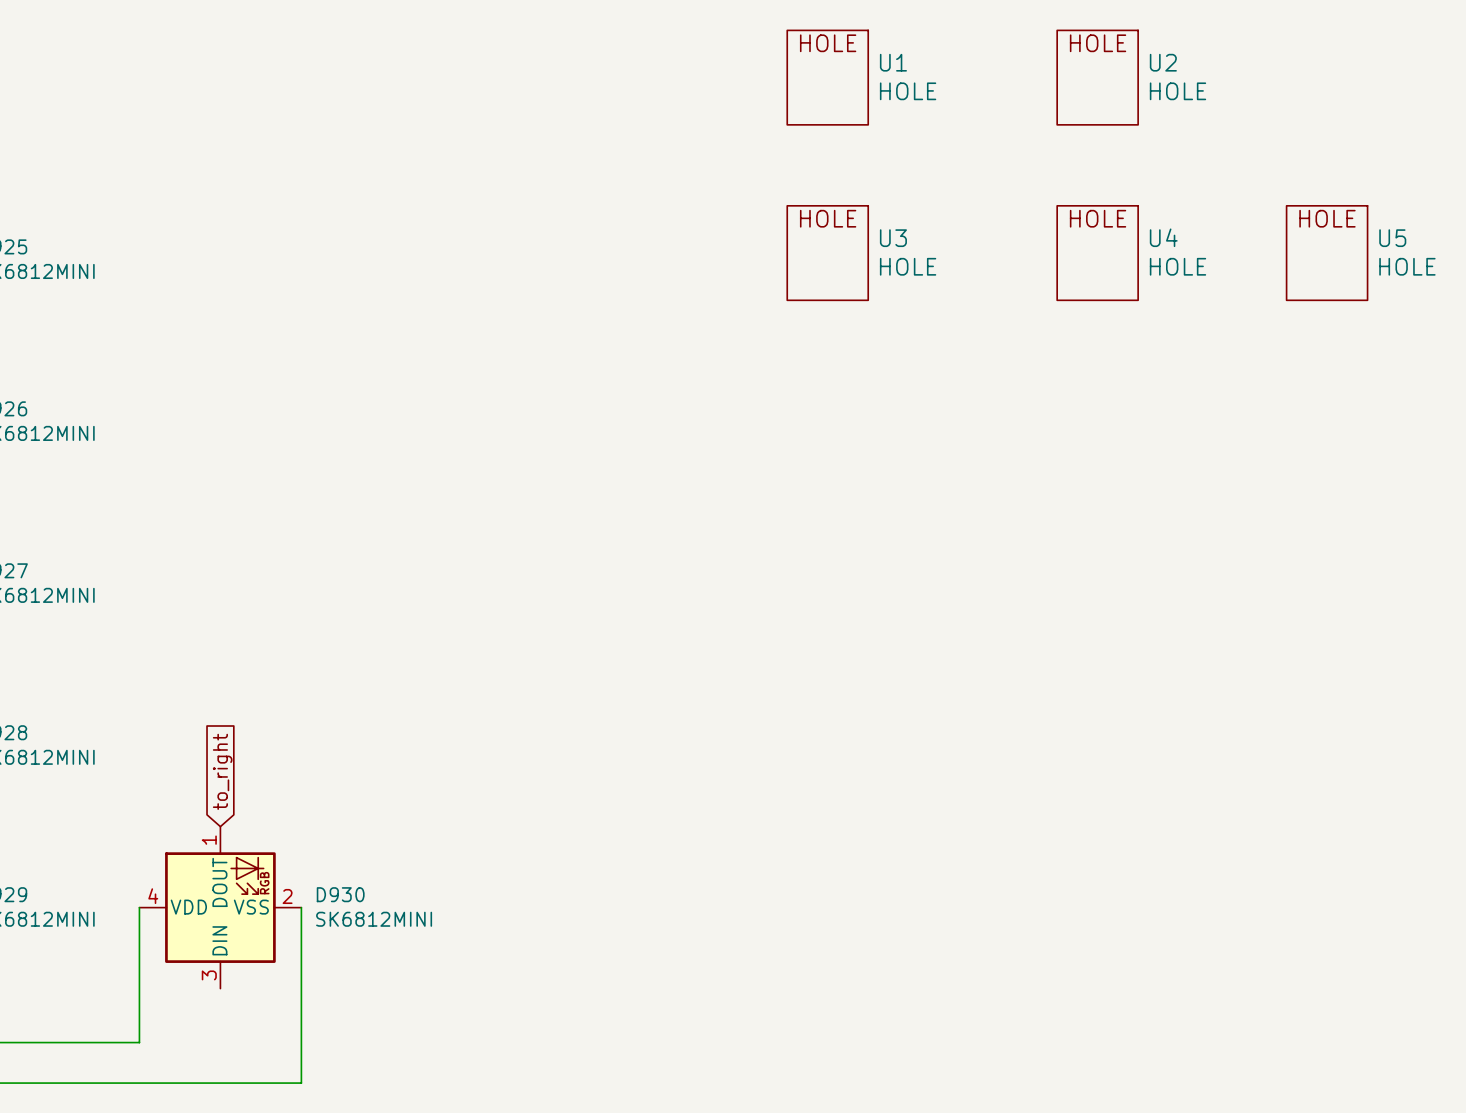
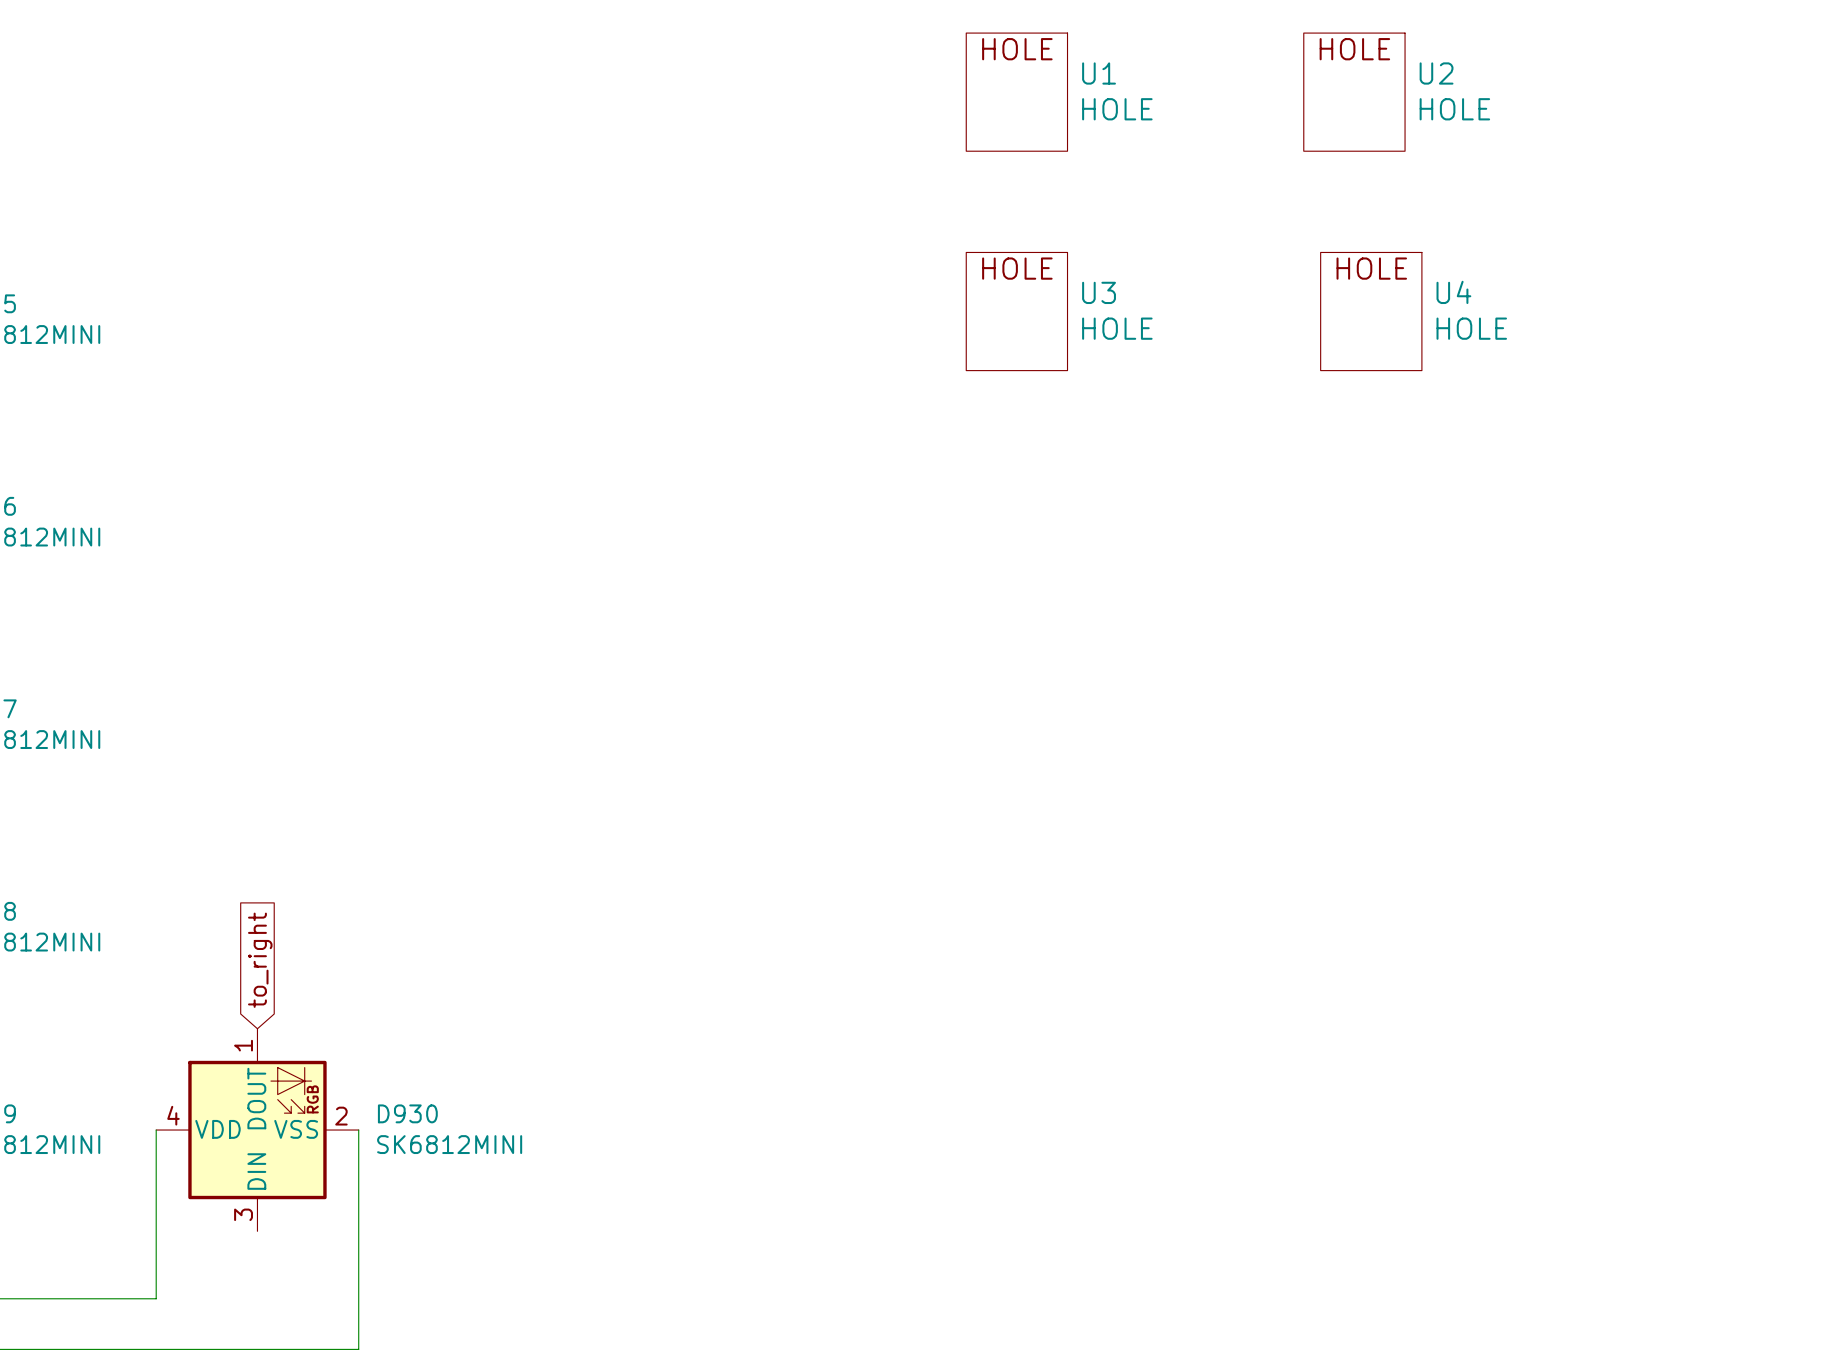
U4 position: (1097, 253) -> (1371, 311)
U5: HOLE (1327, 253) -> none

